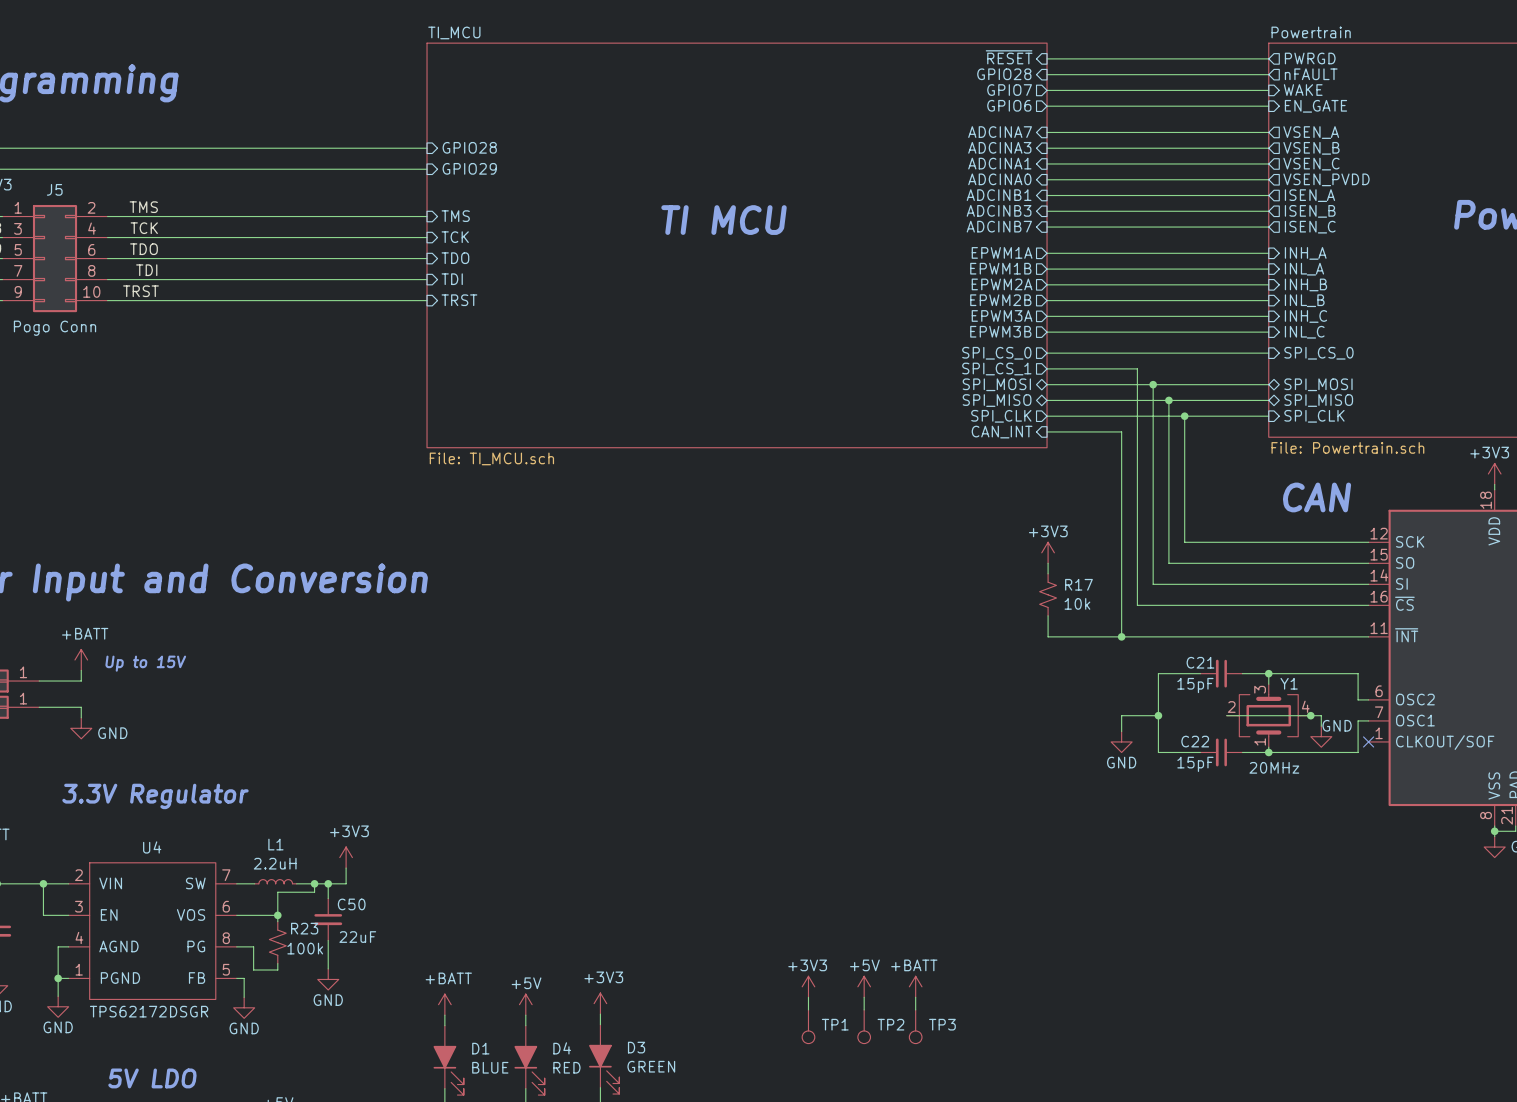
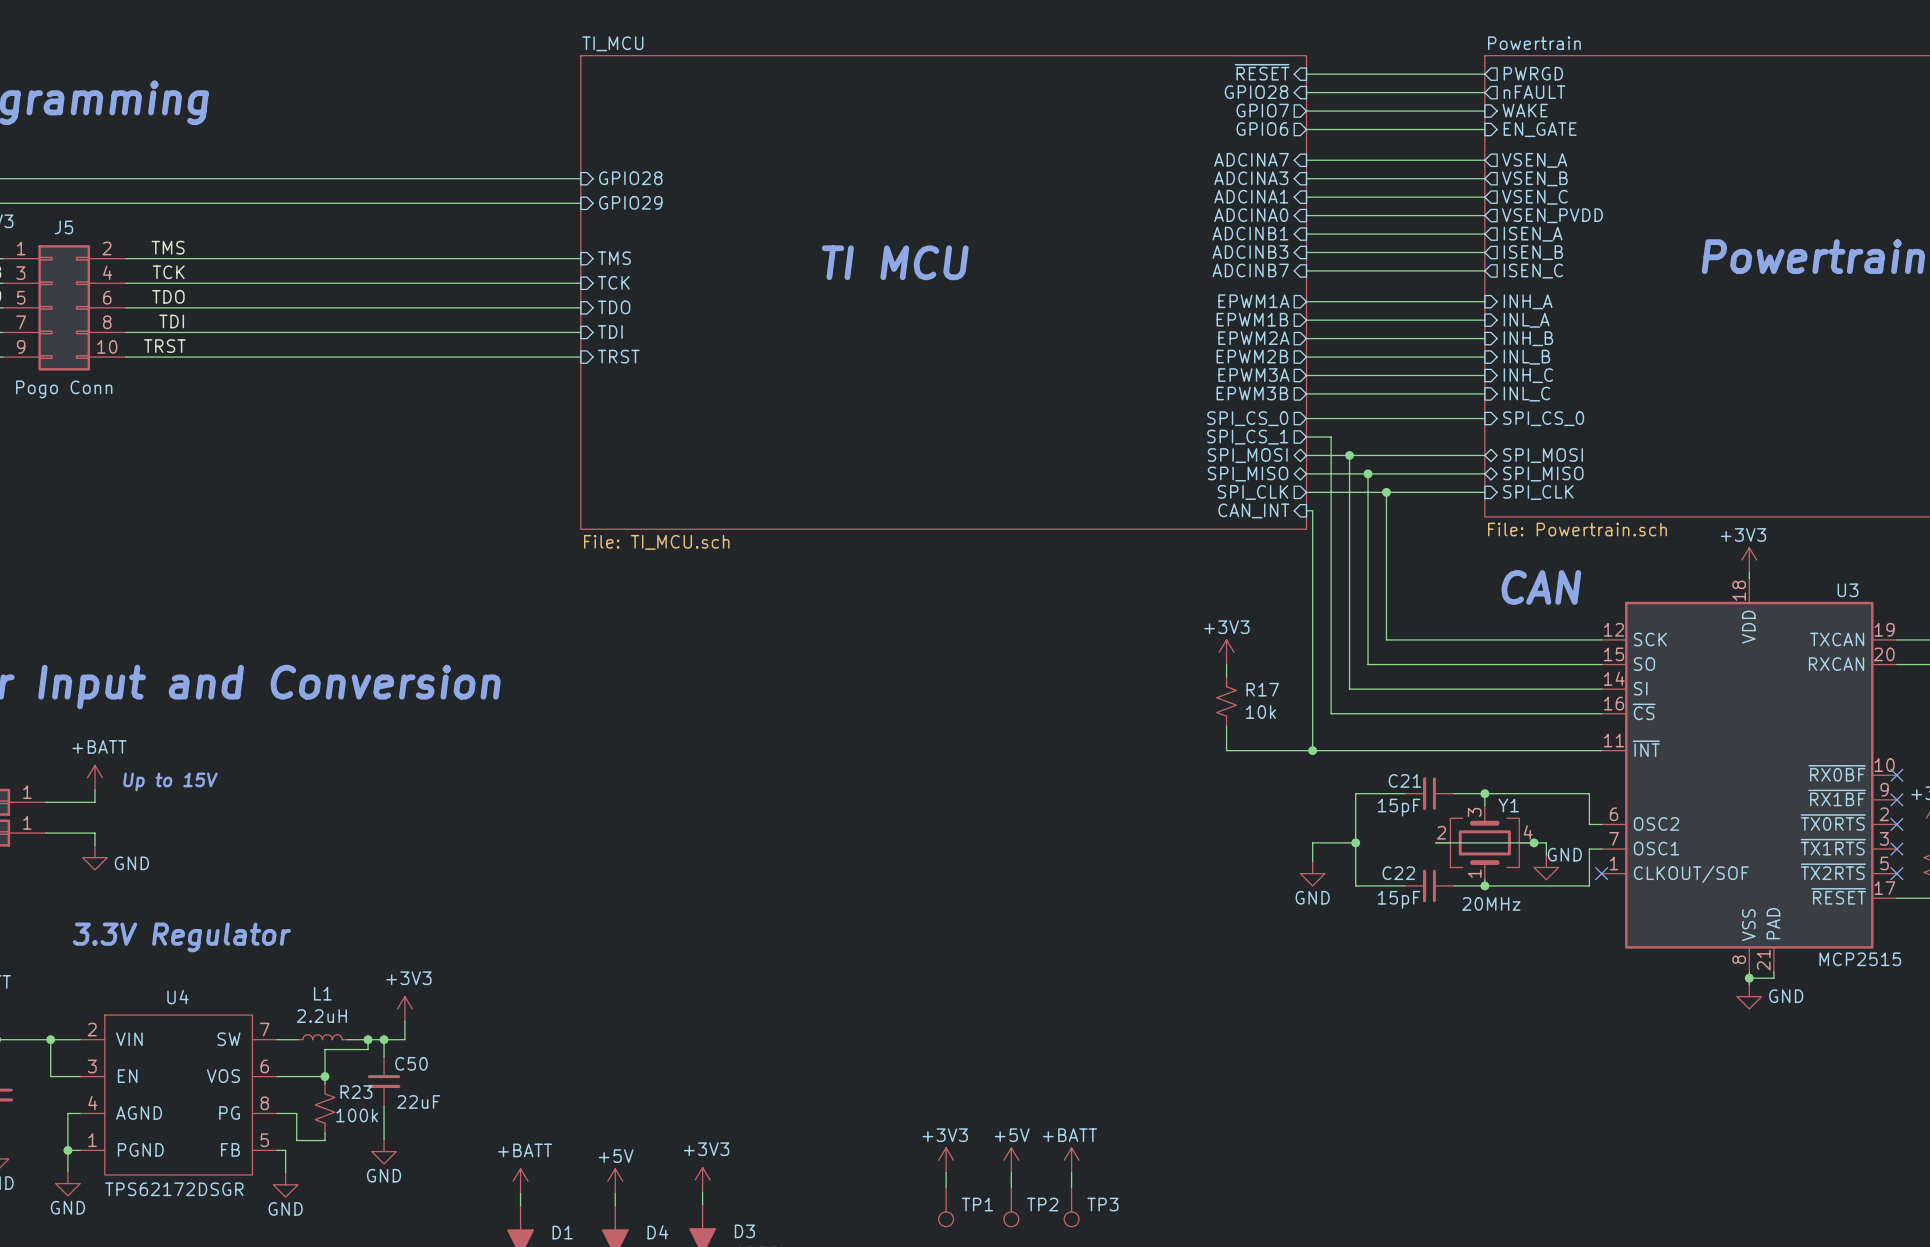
sheet pin position: ~{RESET} (1009, 57) -> ~{RESET} (1262, 72)
wire: (1047, 58) (1116, 58) -> none
sheet pin position: GPIO28 (1004, 74) -> GPIO28 (1256, 92)
wire: (1047, 74) (1116, 74) -> none
sheet pin position: GPIO7 (1009, 90) -> GPIO7 (1262, 110)
wire: (1047, 90) (1116, 90) -> none
sheet pin position: GPIO6 (1009, 105) -> GPIO6 (1262, 129)
wire: (1047, 106) (1116, 106) -> none
sheet pin position: ADCINA7 (1000, 132) -> ADCINA7 (1251, 159)
wire: (1047, 132) (1116, 132) -> none
sheet pin position: GPIO28 (469, 147) -> GPIO28 (630, 178)
sheet pin position: ADCINA3 (999, 147) -> ADCINA3 (1251, 178)
wire: none -> (499, 178) (580, 178)
wire: (1047, 148) (1116, 148) -> none
sheet pin position: ADCINA1 (999, 163) -> ADCINA1 (1251, 196)
wire: (1047, 163) (1116, 163) -> none
sheet pin position: GPIO29 (469, 168) -> GPIO29 (630, 202)
wire: none -> (499, 203) (580, 203)
sheet pin position: ADCINA0 (999, 179) -> ADCINA0 (1251, 215)
wire: (1047, 179) (1116, 179) -> none
sheet pin position: ADCINB1 (999, 195) -> ADCINB1 (1250, 233)
wire: (1047, 195) (1116, 195) -> none
sheet pin position: ADCINB3 (999, 210) -> ADCINB3 (1250, 252)
wire: (1047, 211) (1116, 211) -> none
wire: none -> (499, 258) (580, 258)
sheet pin position: TMS (455, 216) -> TMS (614, 258)
text position: TI MCU (724, 220) -> TI MCU (895, 262)
sheet pin position: ADCINB7 (999, 226) -> ADCINB7 (1250, 270)
wire: (1047, 227) (1116, 227) -> none
wire: none -> (499, 283) (580, 283)
sheet pin position: TCK (455, 237) -> TCK (613, 282)
sheet TI_MCU position: (737, 245) -> (943, 292)
sheet pin position: EPWM1A (1002, 252) -> EPWM1A (1253, 301)
wire: (1047, 253) (1116, 253) -> none
wire: none -> (499, 307) (580, 307)
sheet pin position: TDO (455, 258) -> TDO (614, 307)
sheet pin position: EPWM1B (1000, 268) -> EPWM1B (1252, 319)
wire: (1047, 269) (1116, 269) -> none
wire: none -> (499, 332) (580, 332)
sheet pin position: TDI (452, 279) -> TDI (610, 331)
sheet pin position: EPWM2A (1002, 284) -> EPWM2A (1253, 338)
wire: (1047, 284) (1116, 284) -> none
wire: none -> (499, 357) (580, 357)
sheet pin position: TRST (459, 300) -> TRST (618, 356)
sheet pin position: EPWM2B (1000, 300) -> EPWM2B (1252, 356)
wire: (1047, 300) (1116, 300) -> none
sheet pin position: EPWM3A (1002, 315) -> EPWM3A (1253, 375)
wire: (1047, 316) (1116, 316) -> none
sheet pin position: EPWM3B (1000, 331) -> EPWM3B (1252, 393)
wire: (1047, 332) (1116, 332) -> none
sheet pin position: SPI_CS_0 (996, 353) -> SPI_CS_0 (1247, 418)
wire: (1047, 353) (1116, 353) -> none
wire: (1047, 368) (1116, 368) -> none
sheet pin position: SPI_CS_1 (996, 369) -> SPI_CS_1 (1247, 437)
sheet pin position: SPI_MOSI (996, 384) -> SPI_MOSI (1247, 455)
wire: (1047, 384) (1116, 384) -> none
sheet pin position: SPI_MISO (997, 400) -> SPI_MISO (1248, 474)
wire: (1047, 400) (1116, 400) -> none
sheet pin position: SPI_CLK (1001, 416) -> SPI_CLK (1253, 492)
wire: (1047, 416) (1116, 416) -> none
wire: (1047, 431) (1116, 431) -> none
sheet pin position: CAN_INT (1002, 432) -> CAN_INT (1253, 510)

